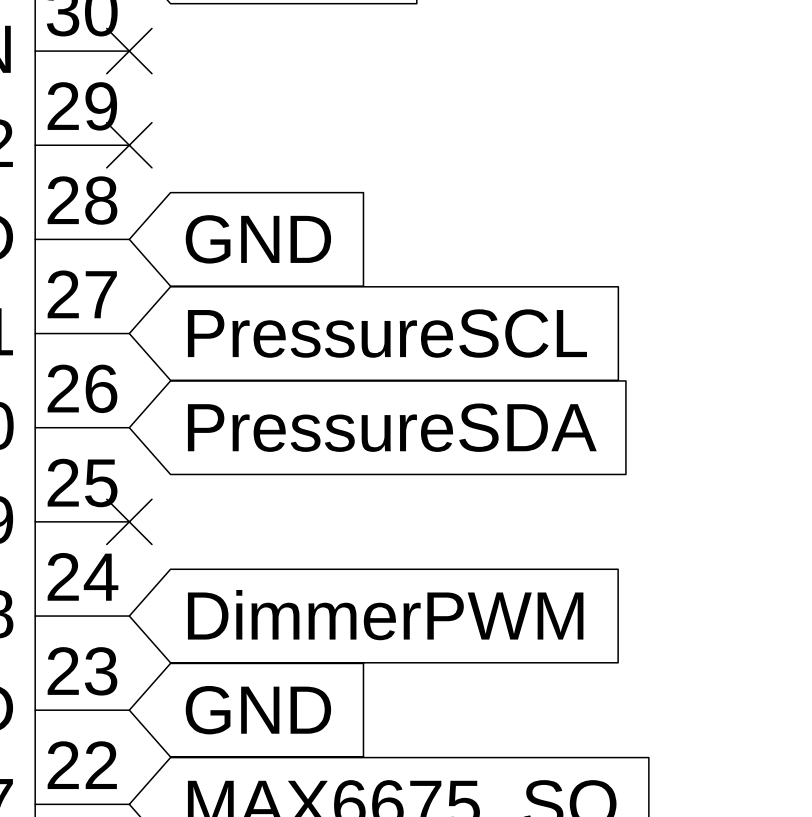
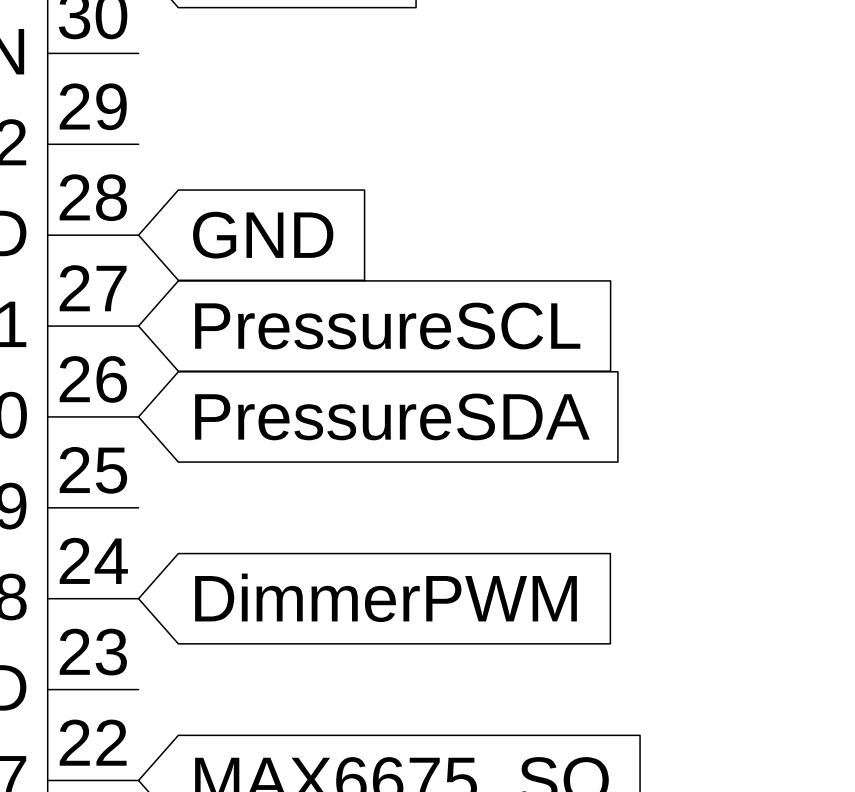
no-connect mark: (129, 51) -> none
no-connect mark: (129, 145) -> none
no-connect mark: (129, 521) -> none
global label: GND (258, 710) -> none

